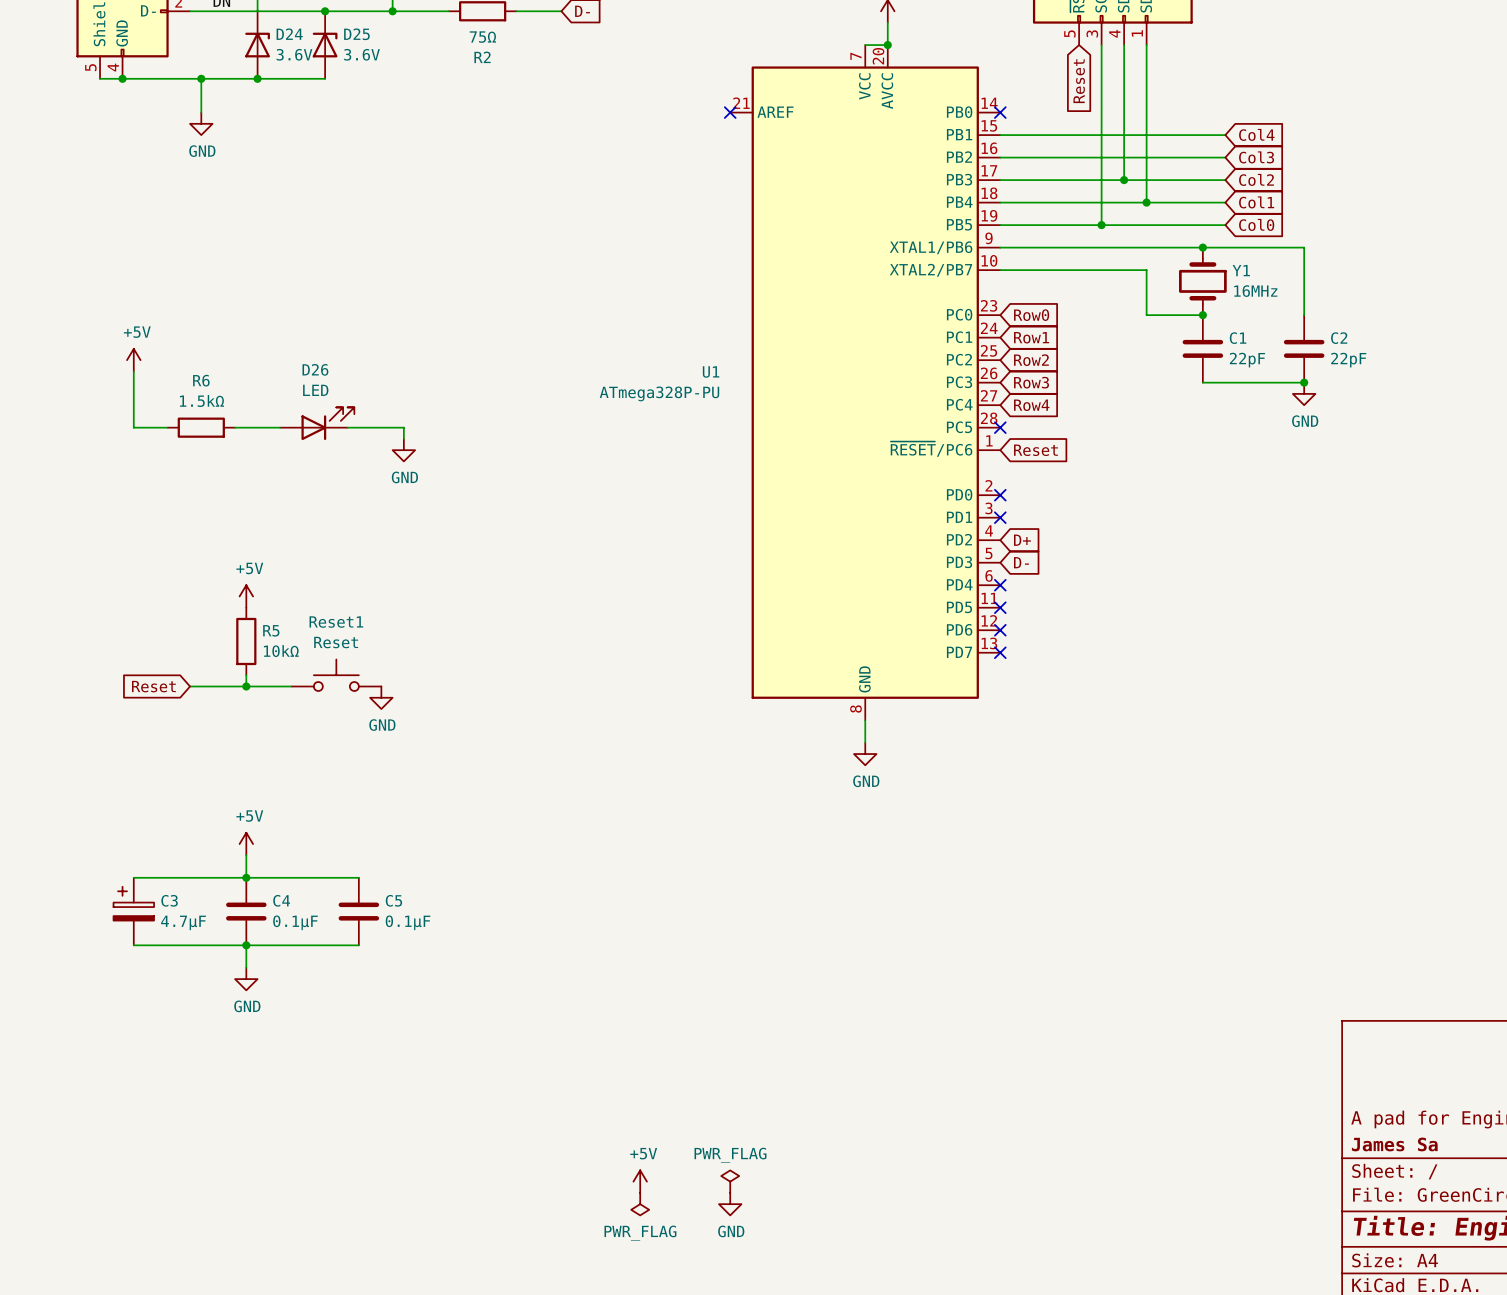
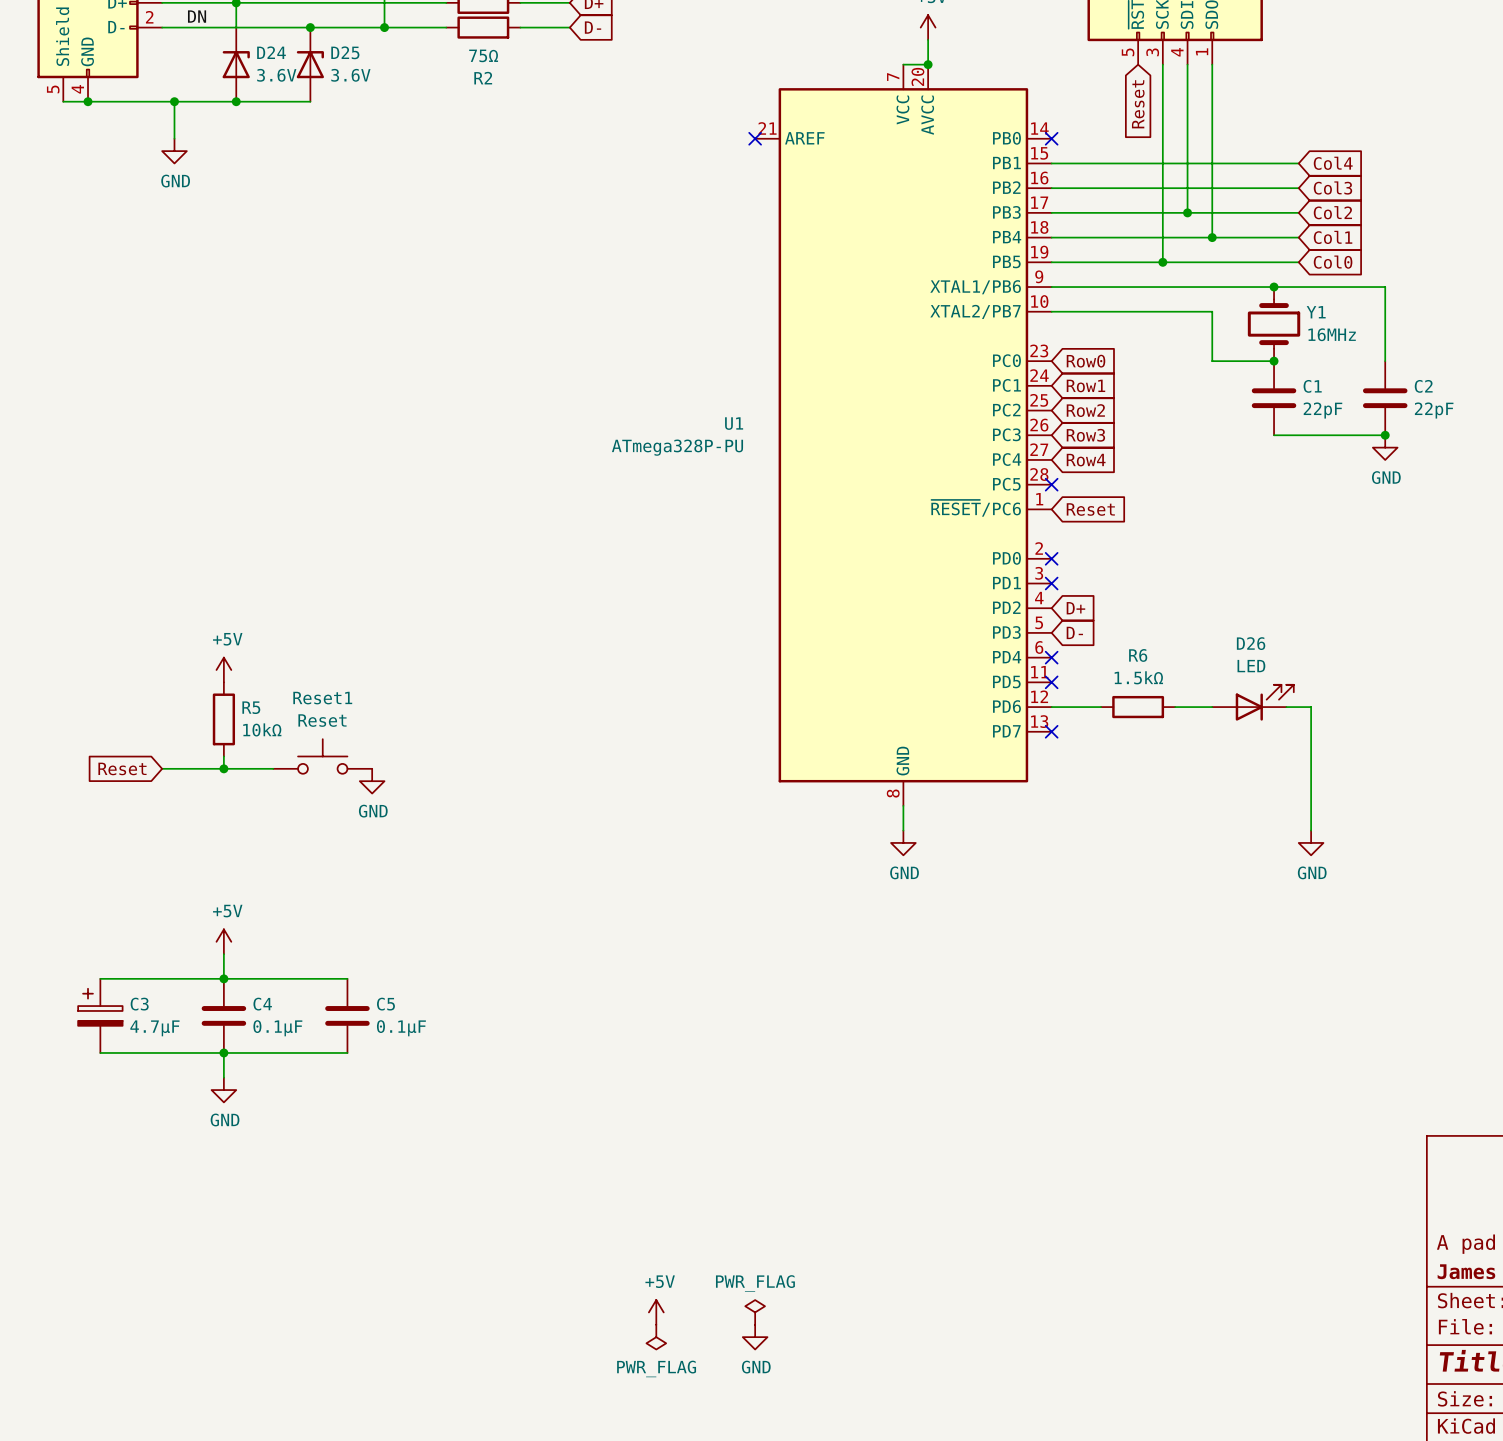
power symbol: +5V (133, 360) -> none
wire: (133, 371) (133, 427) (167, 427) -> none
D26 position: (317, 423) -> (1253, 702)
R6 position: (201, 427) -> (1138, 707)
wire: (235, 427) (280, 427) -> none
wire: (347, 427) (403, 427) (403, 438) -> none
power symbol: GND (403, 450) -> none
wire: none -> (1051, 707) (1101, 707)
no-connect mark: (1000, 630) -> none
wire: none -> (1175, 707) (1212, 707)
wire: none -> (1286, 707) (1311, 707) (1311, 830)
power symbol: none -> GND (1311, 842)

